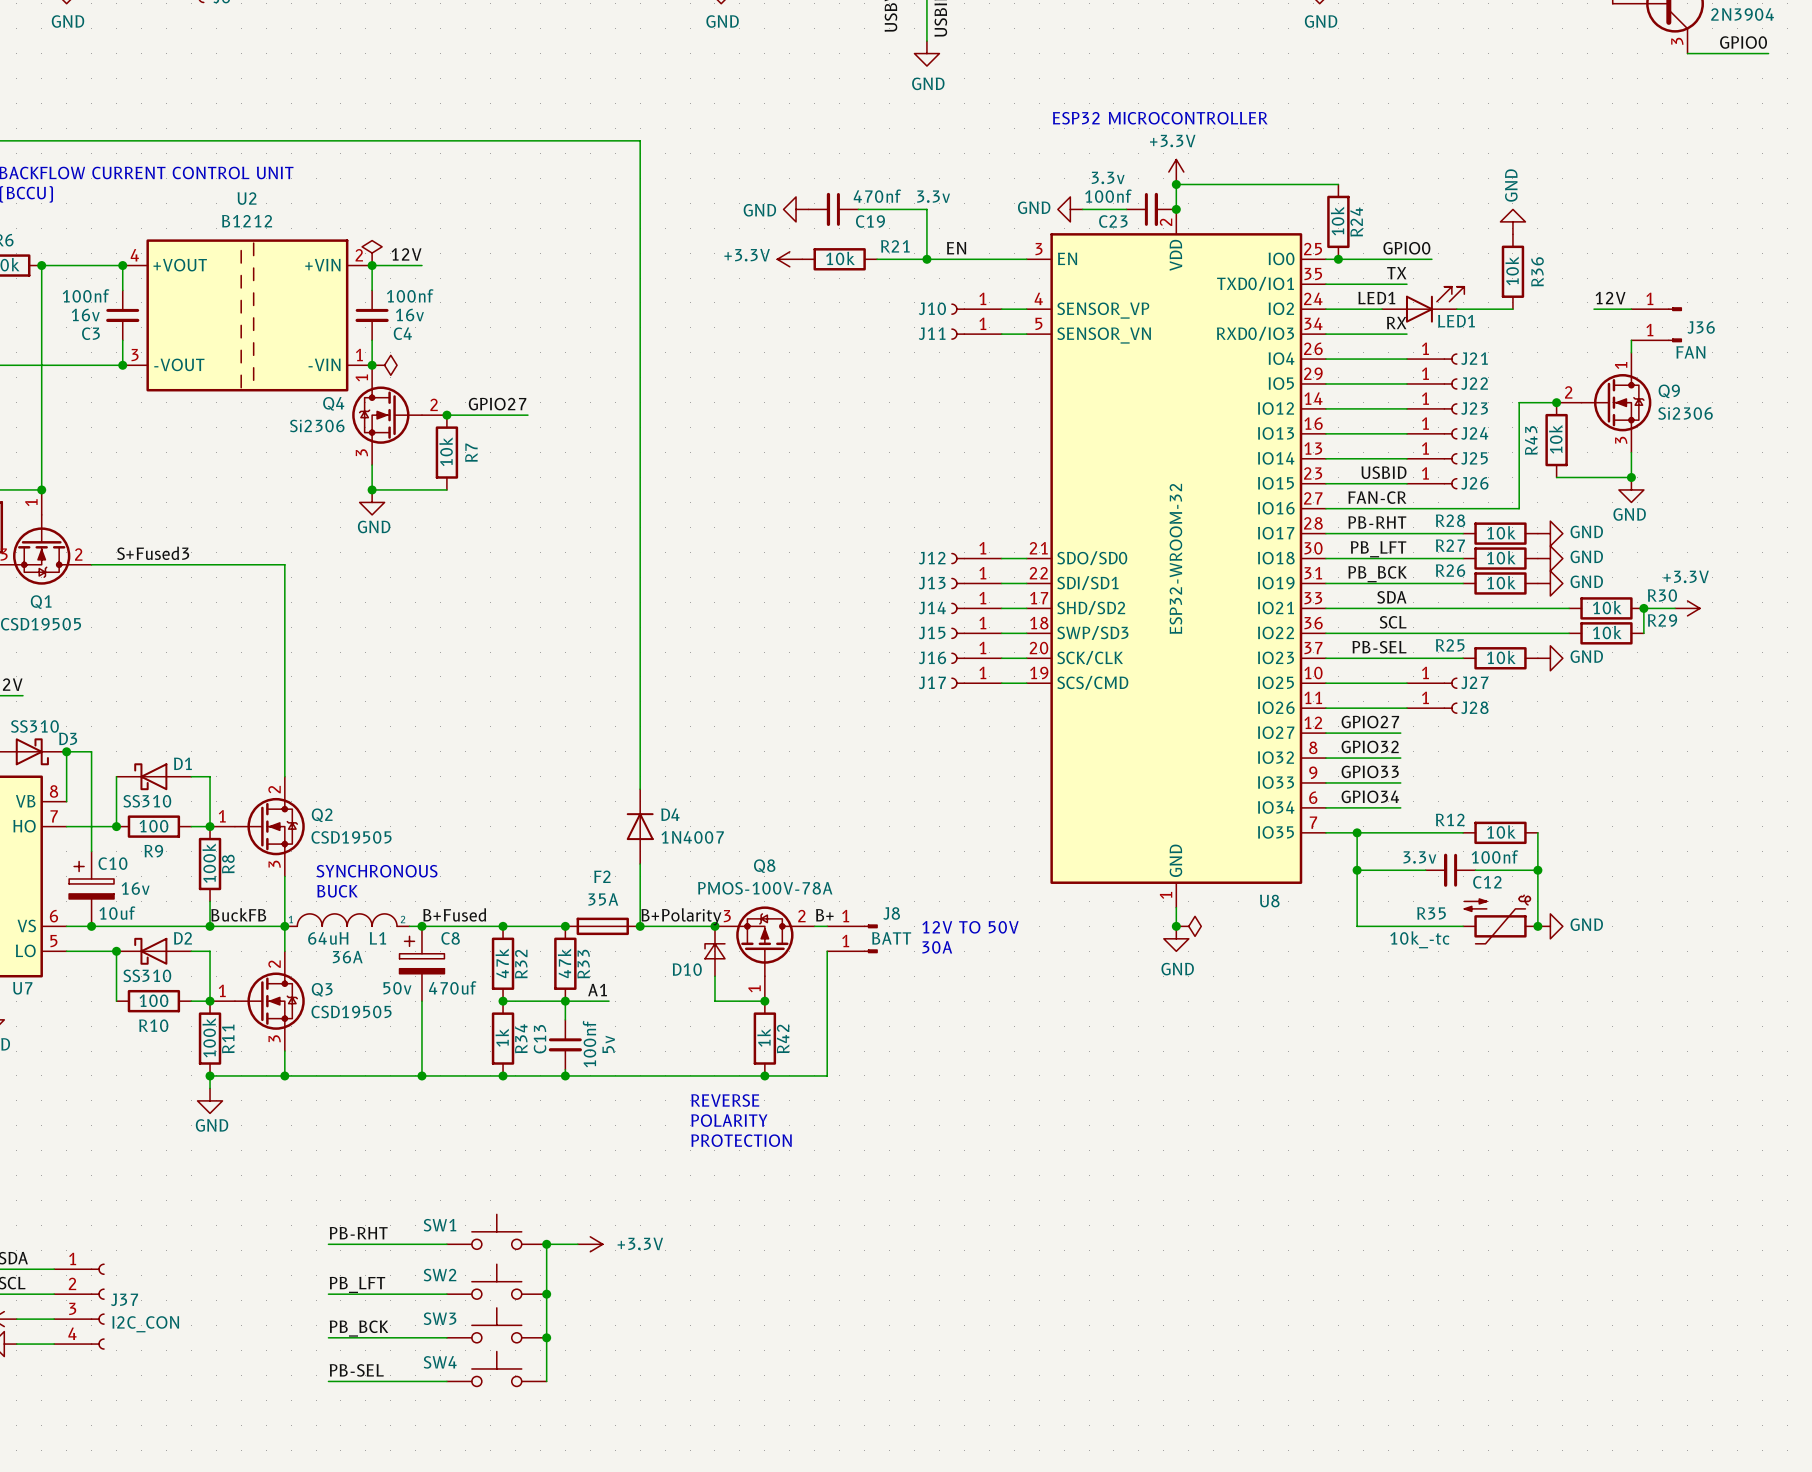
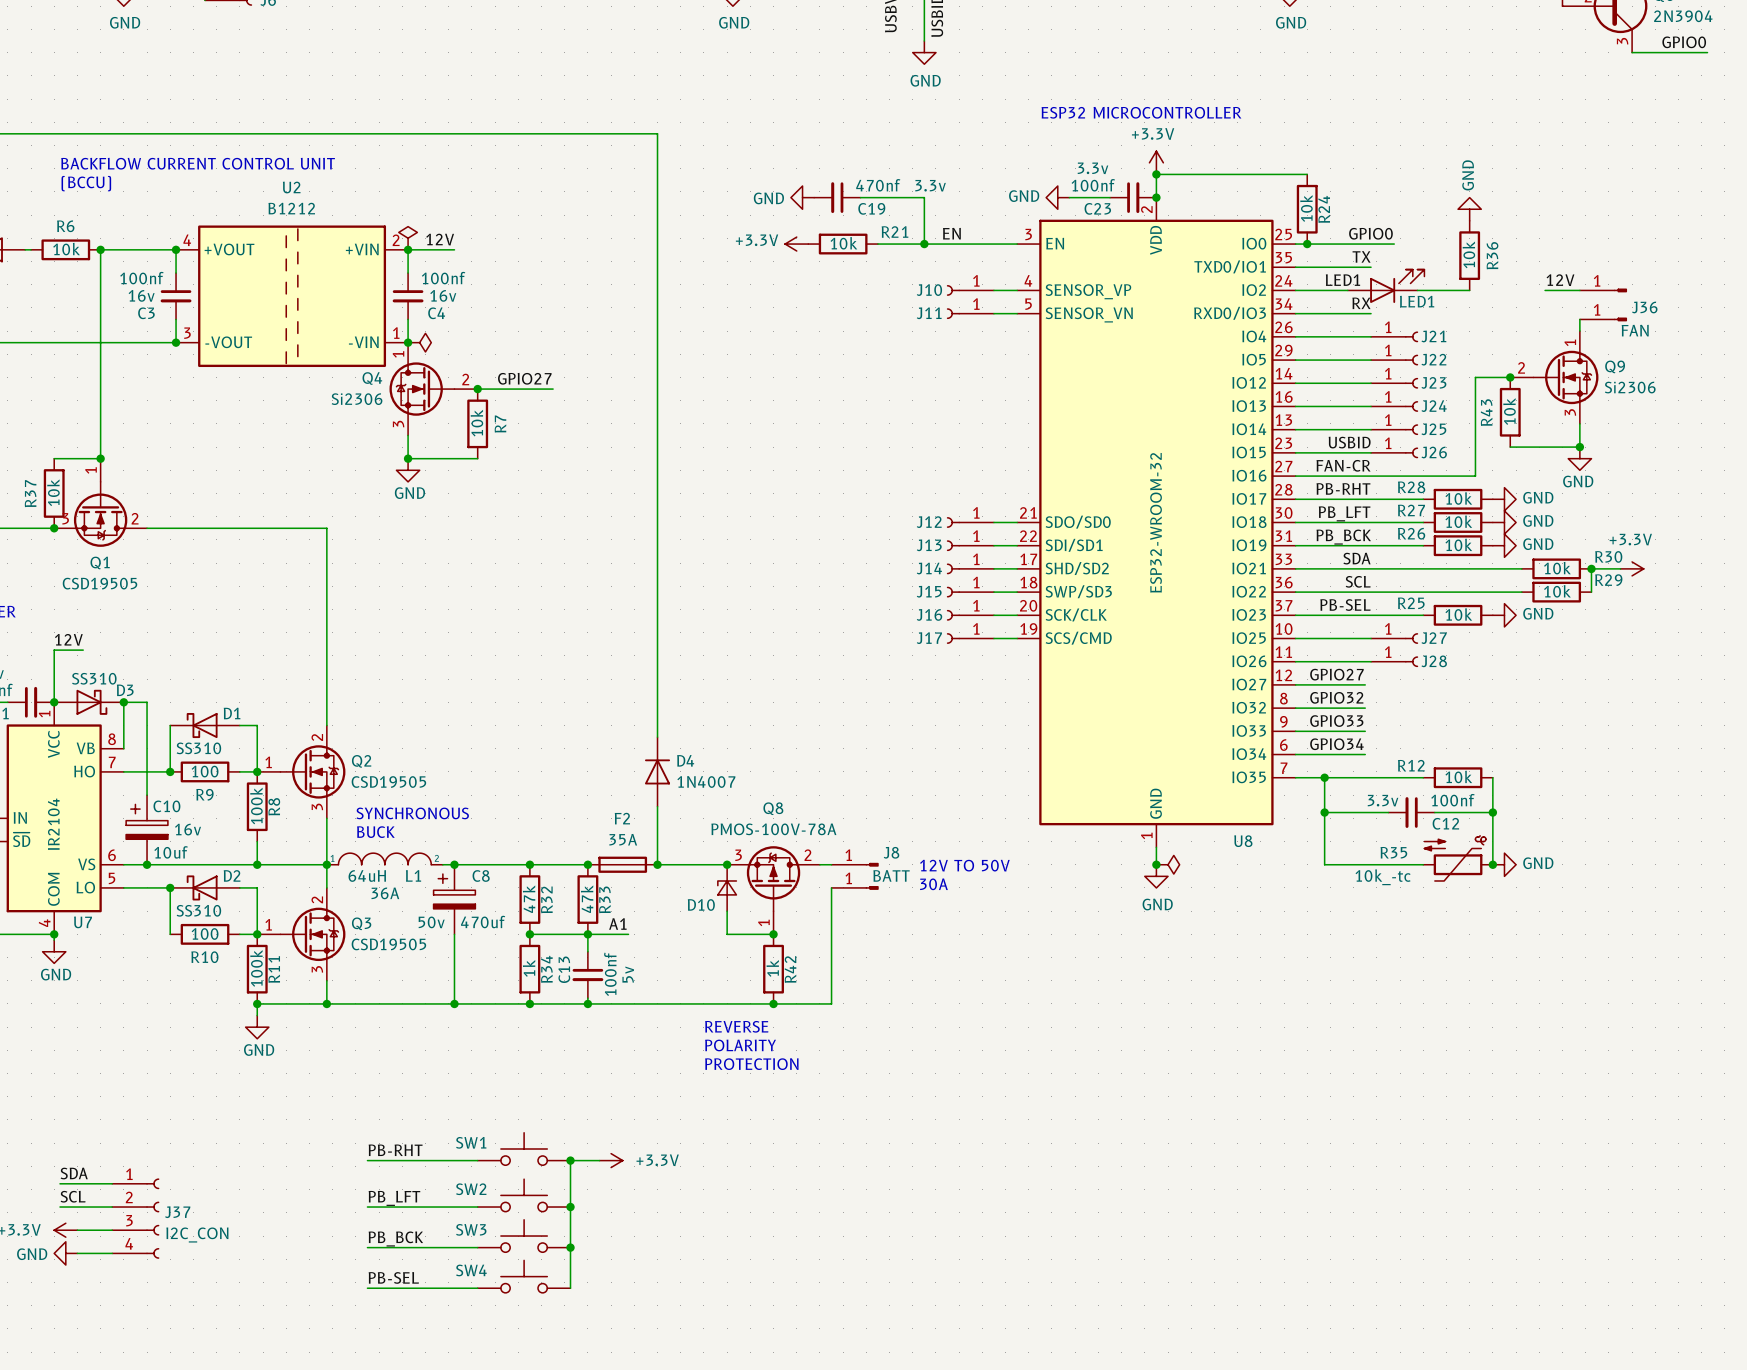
label: S+Fused3 (153, 553) -> none
label: BuckFB (238, 914) -> none
label: B+Fused (454, 914) -> none
label: B+ (824, 915) -> none
label: B+Polarity (681, 916) -> none

